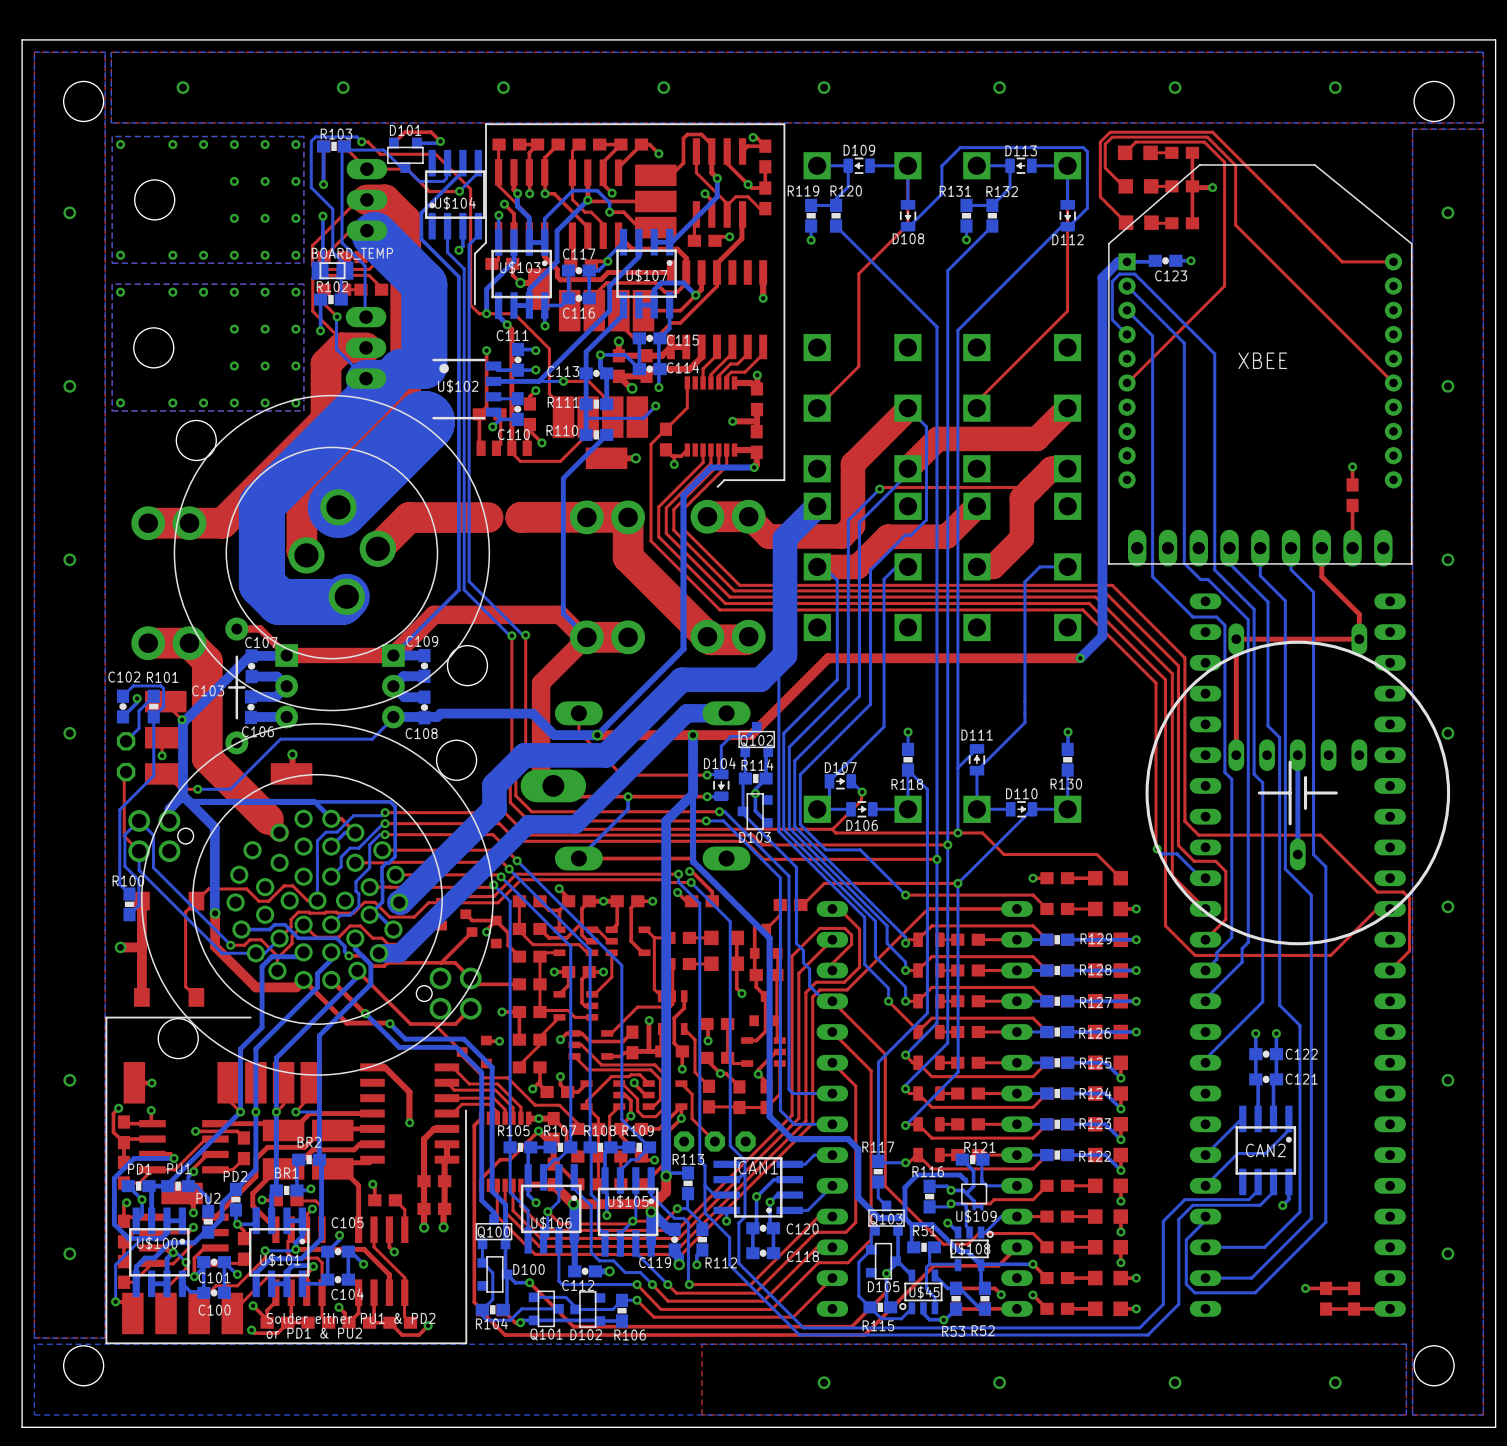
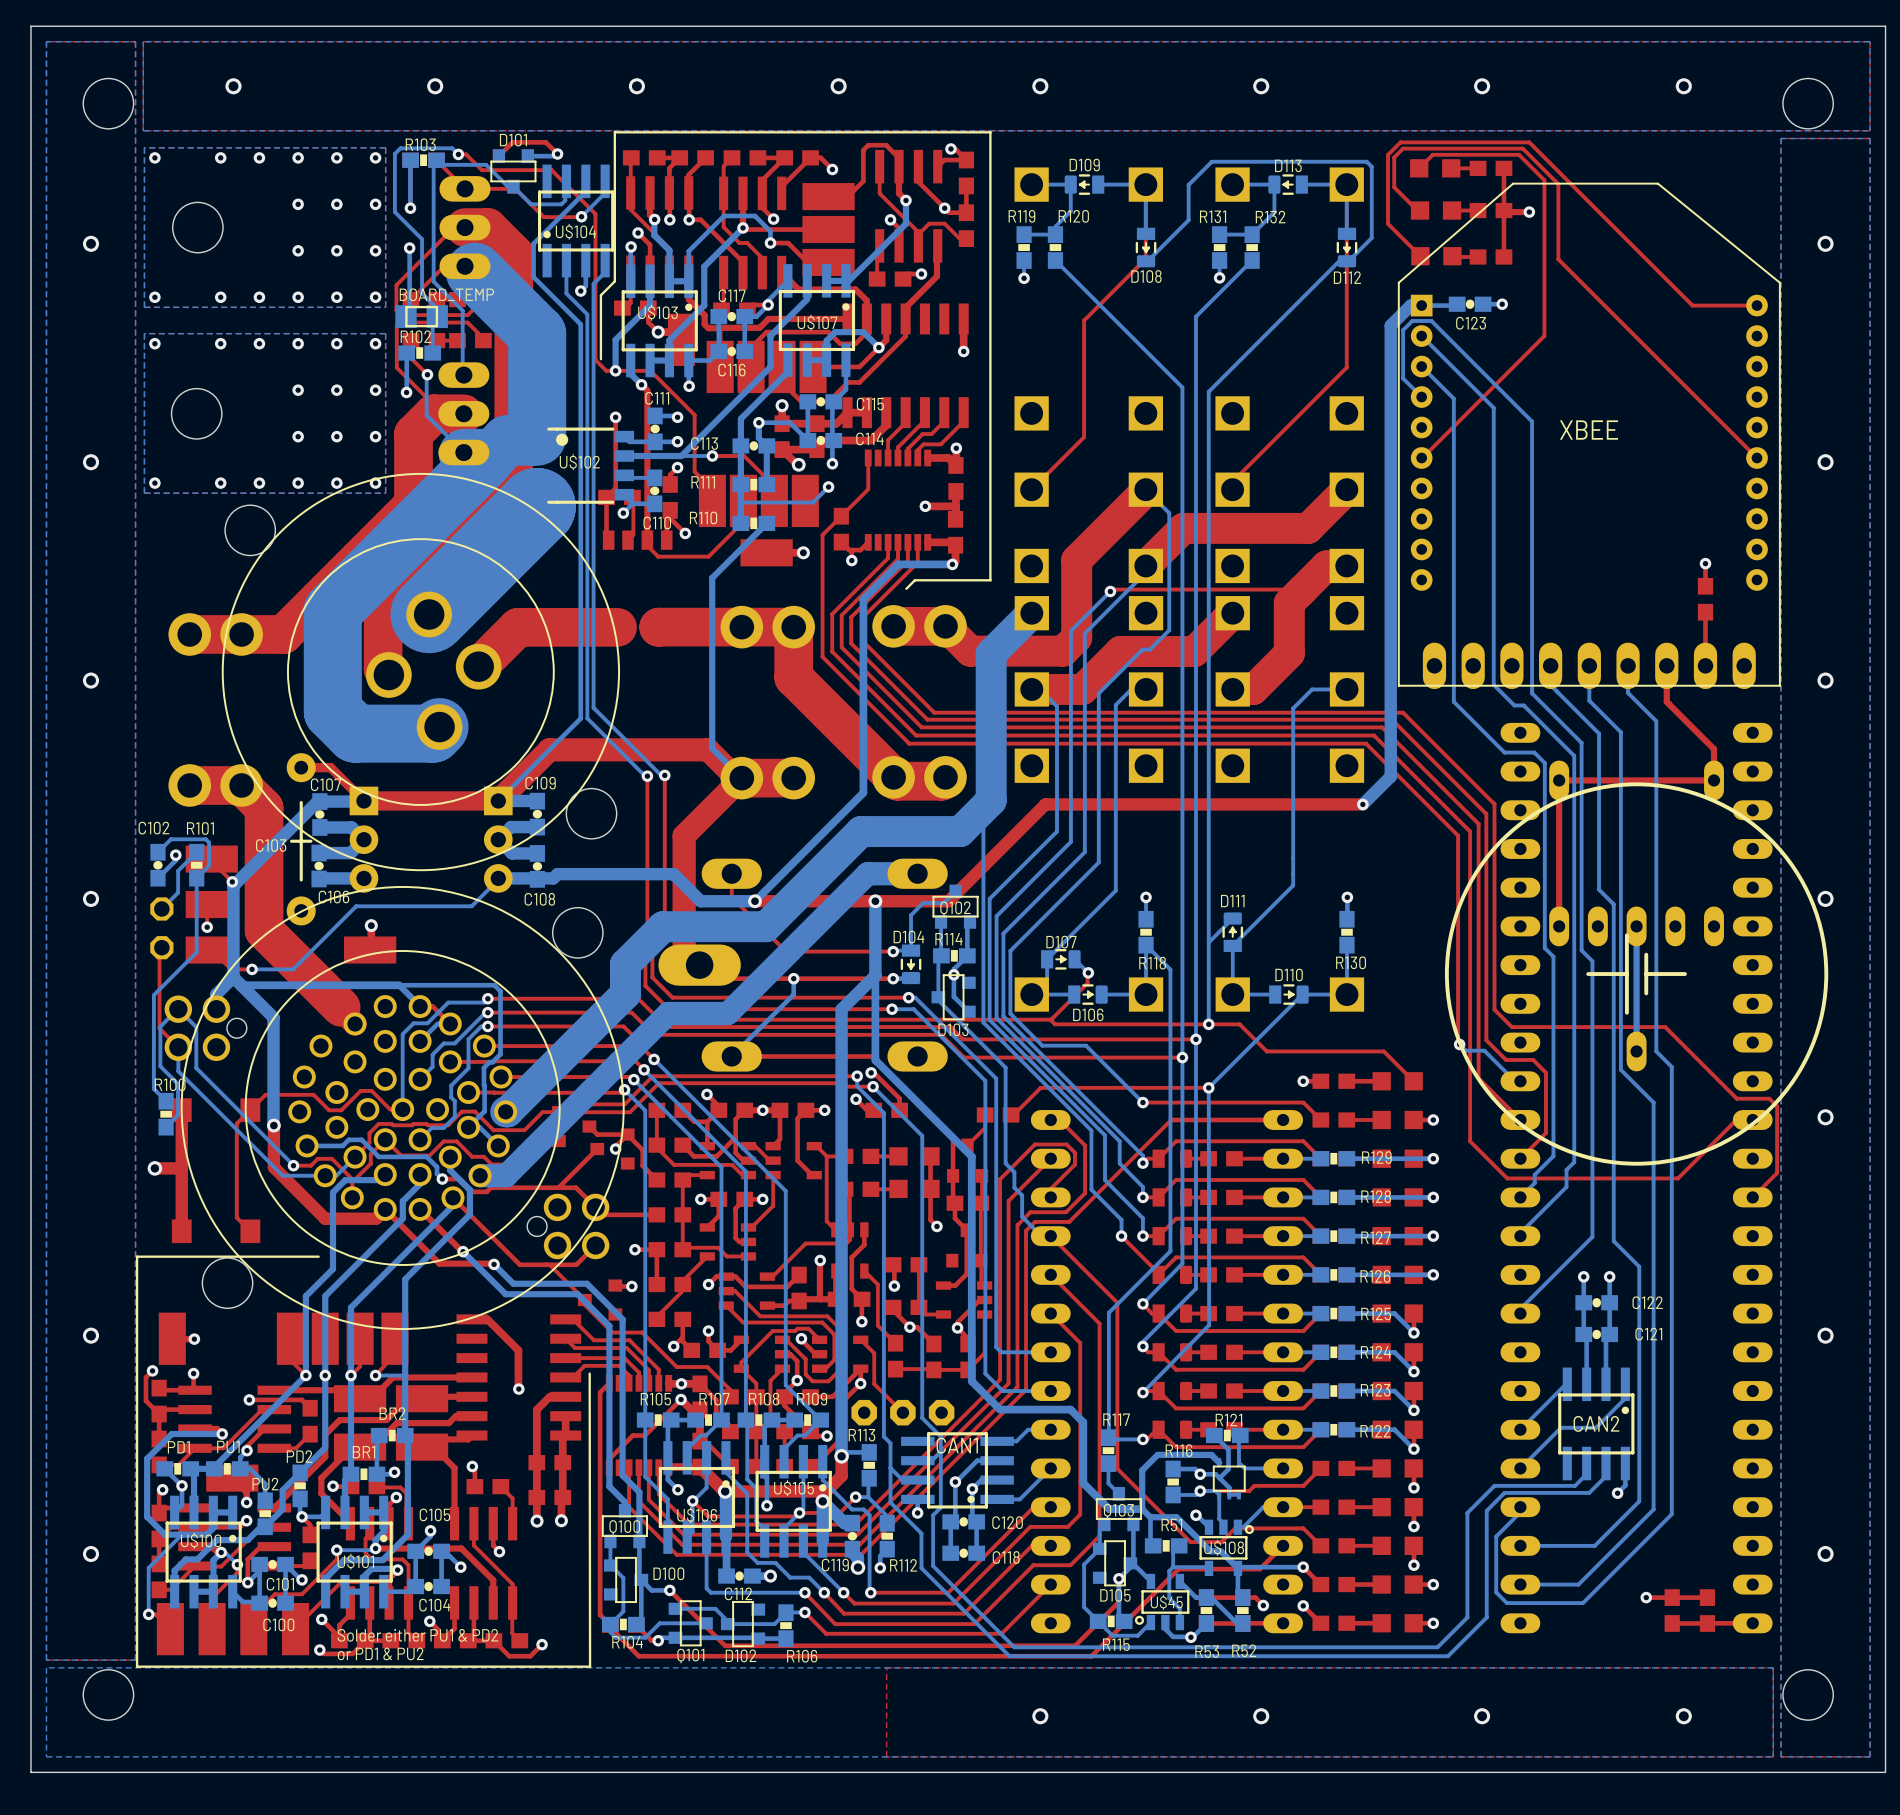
U$109 name: U$109 (976, 1216) -> none

